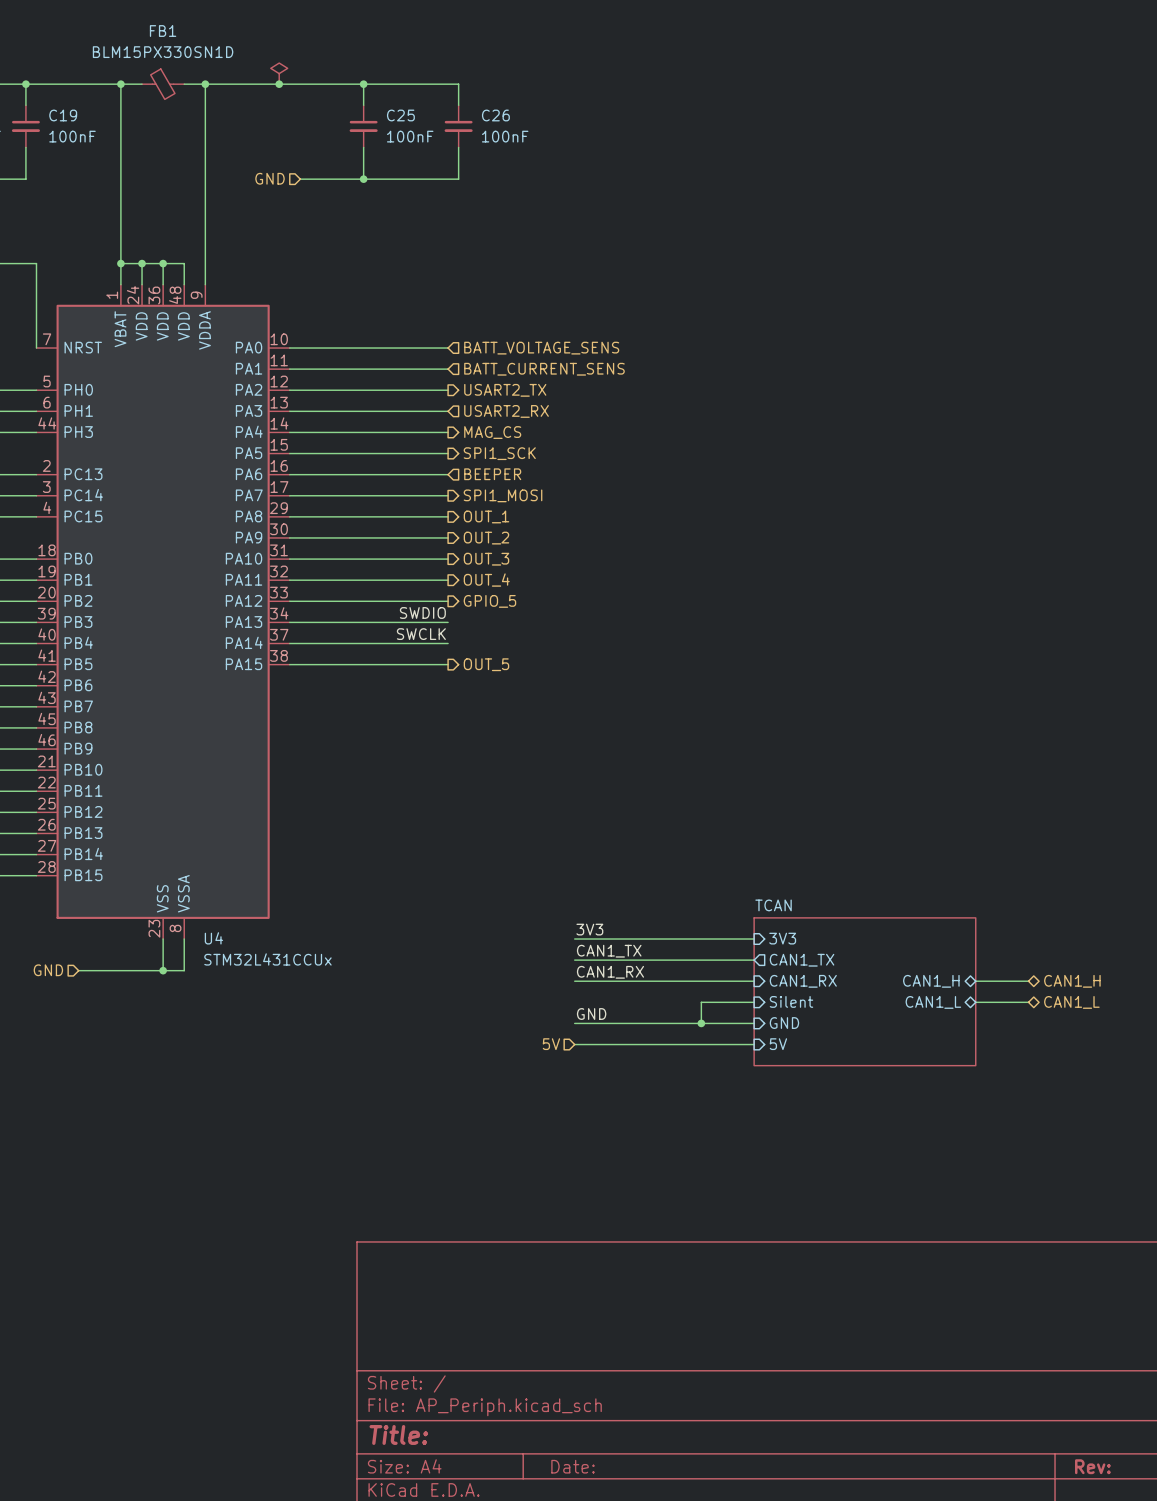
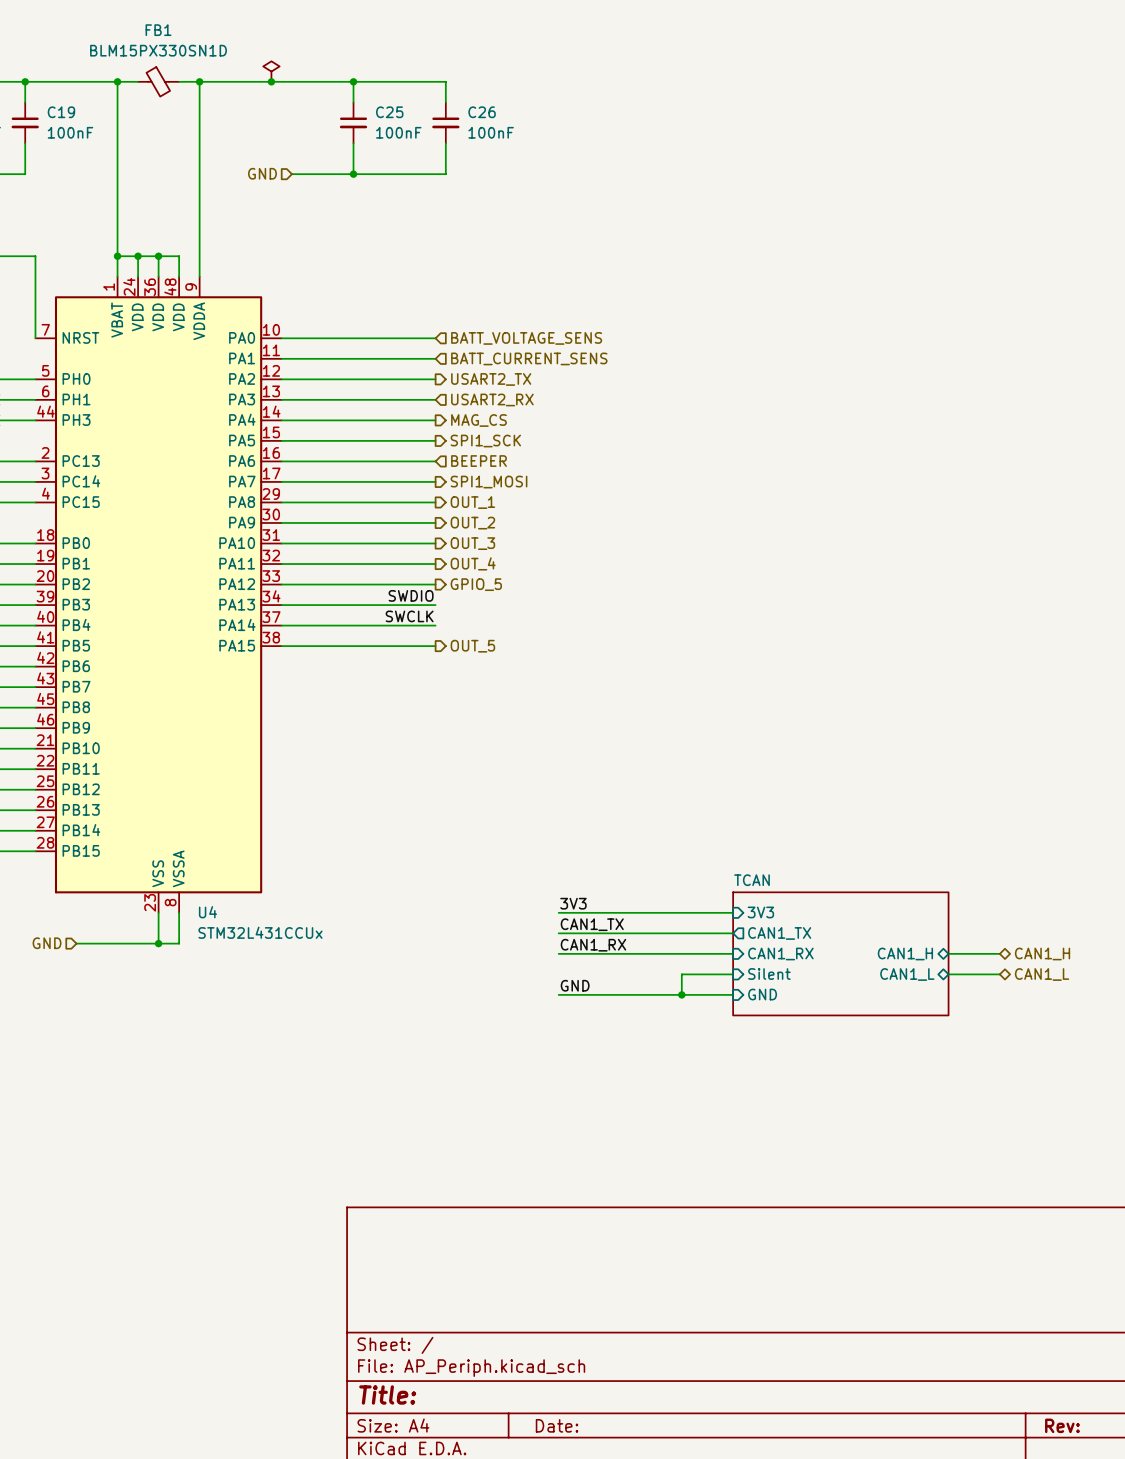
sheet TCAN: none -> (840, 953)
sheet TCAN: (864, 991) -> none
hierarchical label: 5V (551, 1044) -> none
wire: (574, 1044) (754, 1044) -> none
sheet pin: 5V (778, 1044) -> none

